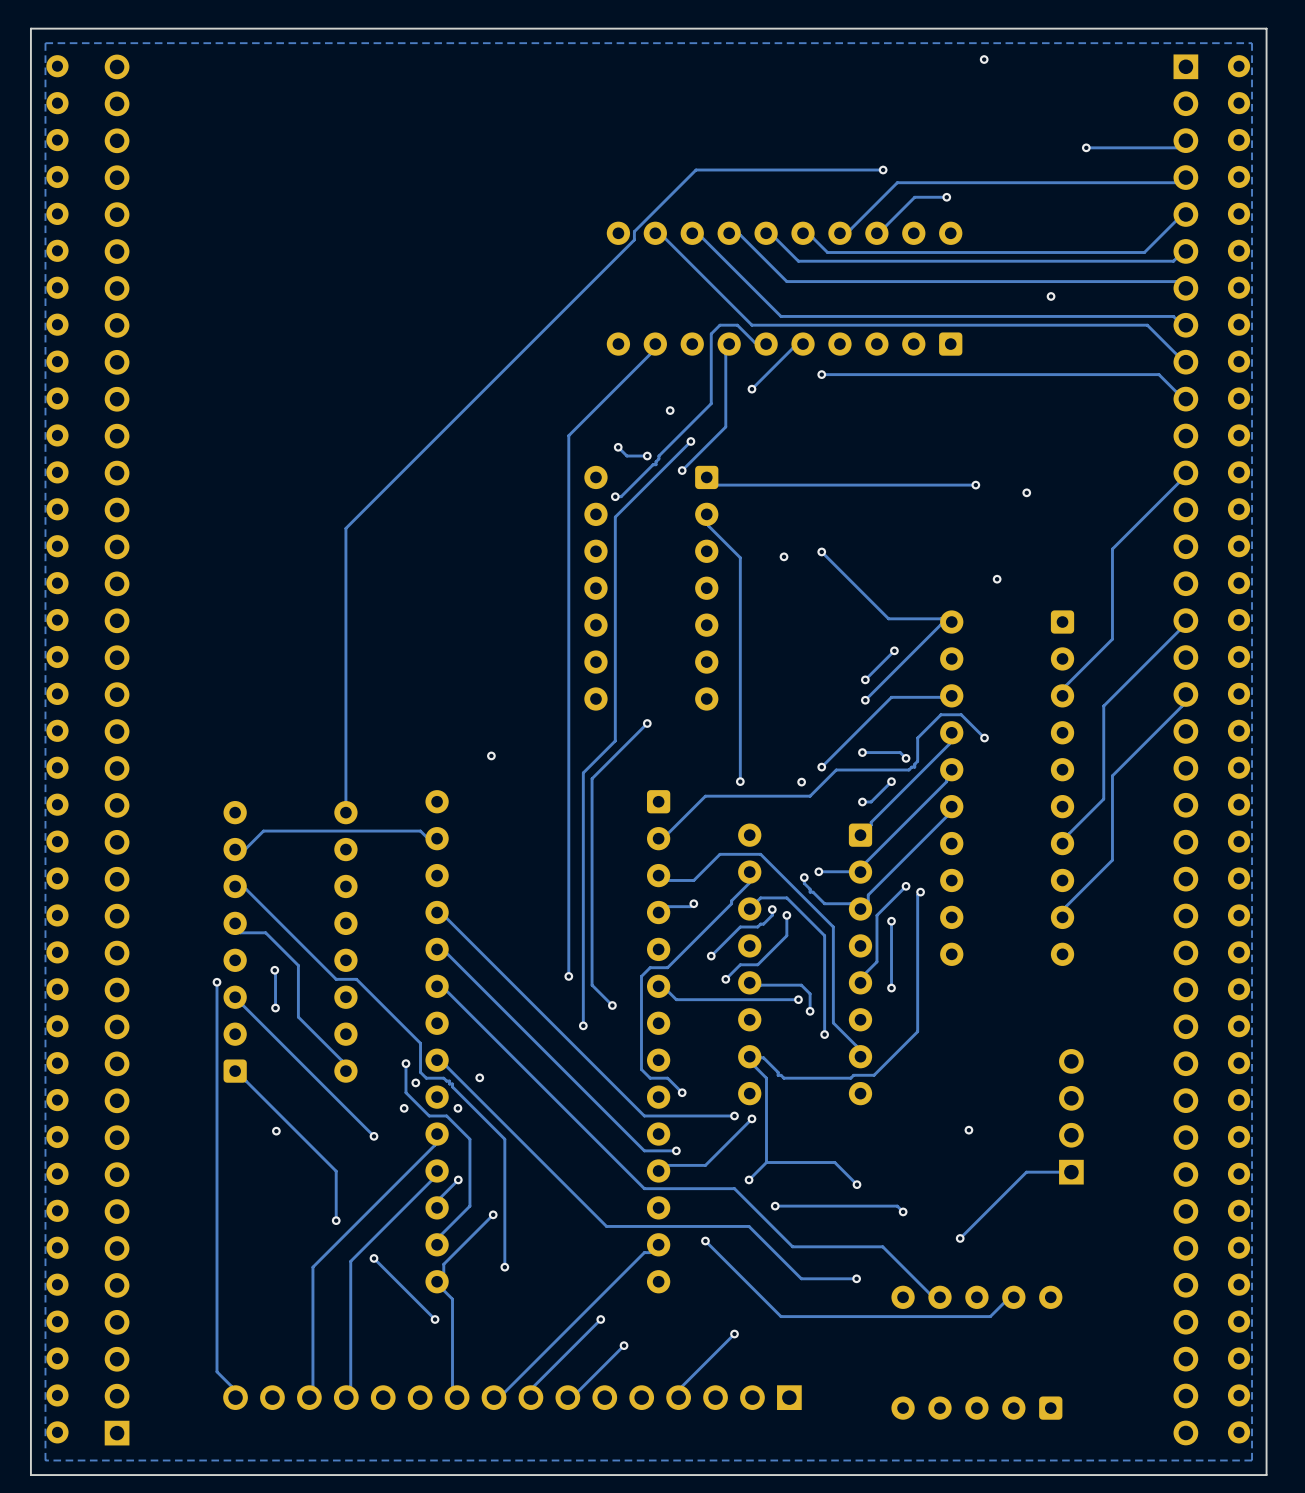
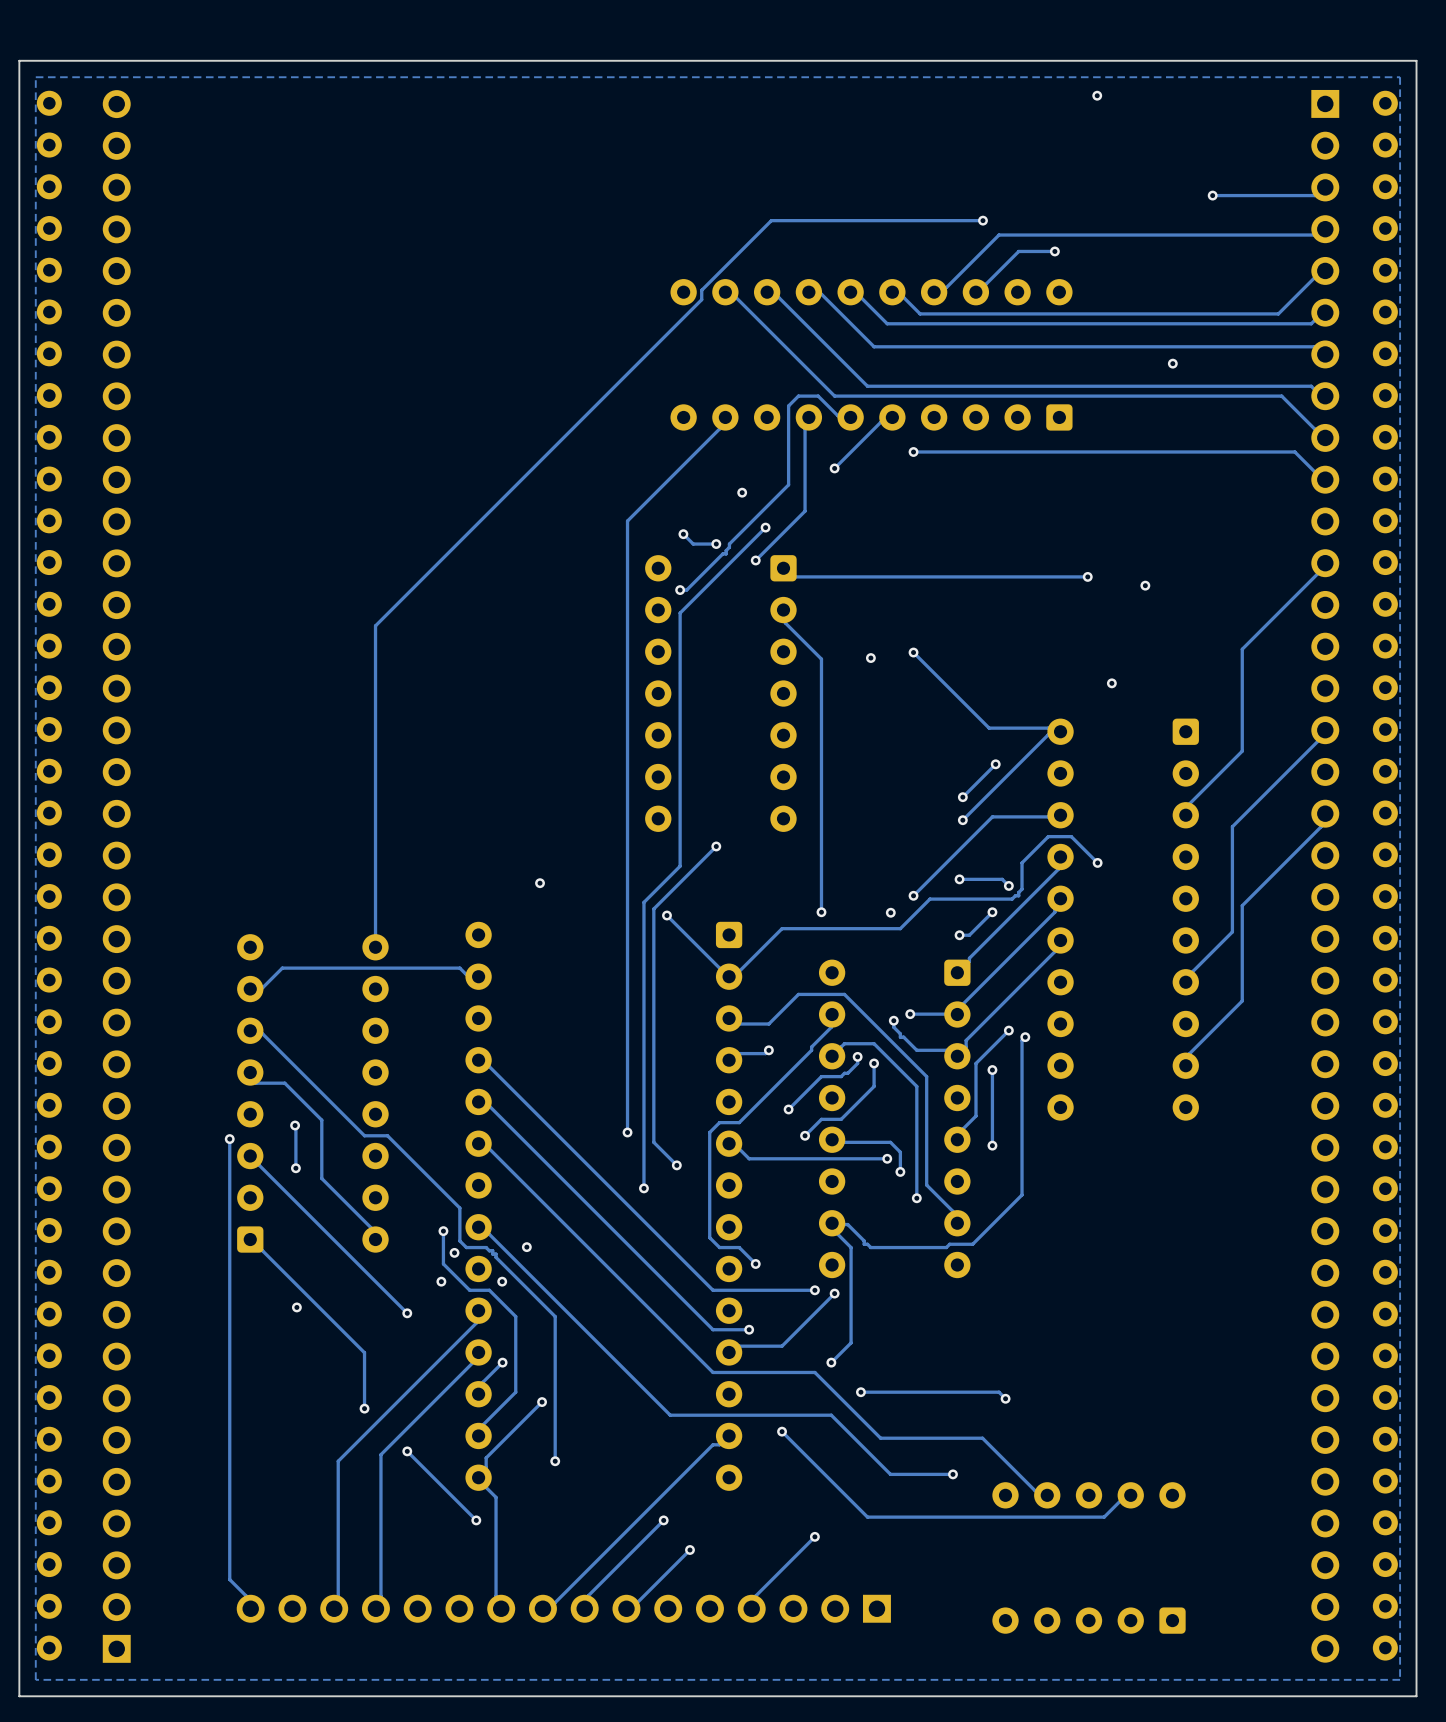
track: none -> (666, 915) (729, 976)
via: none -> (666, 915)
part: (1071, 1116) -> none
via: (968, 1130) -> none
track: (766, 1162) (834, 1162) (856, 1184) -> none
track: (1071, 1172) (1026, 1172) (960, 1238) -> none
via: (856, 1184) -> none
via: (960, 1238) -> none

